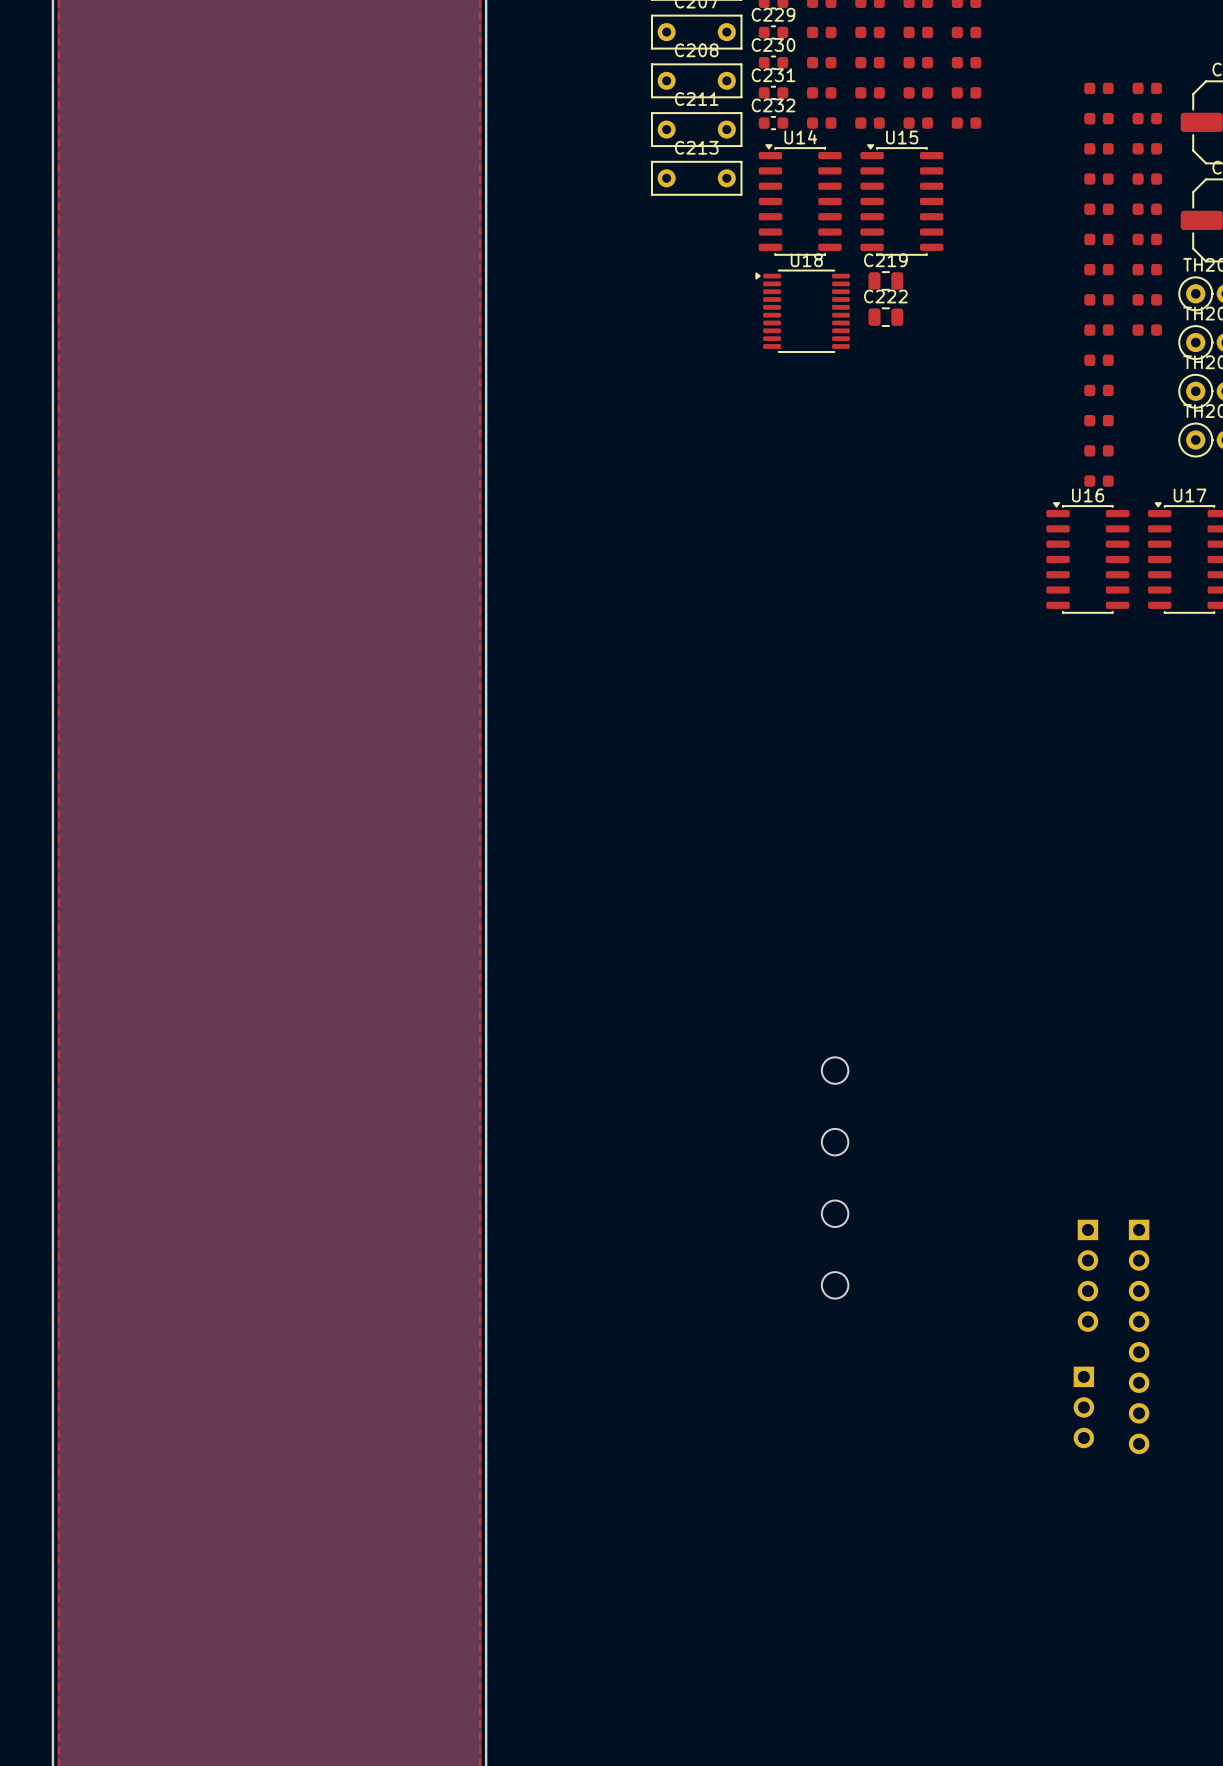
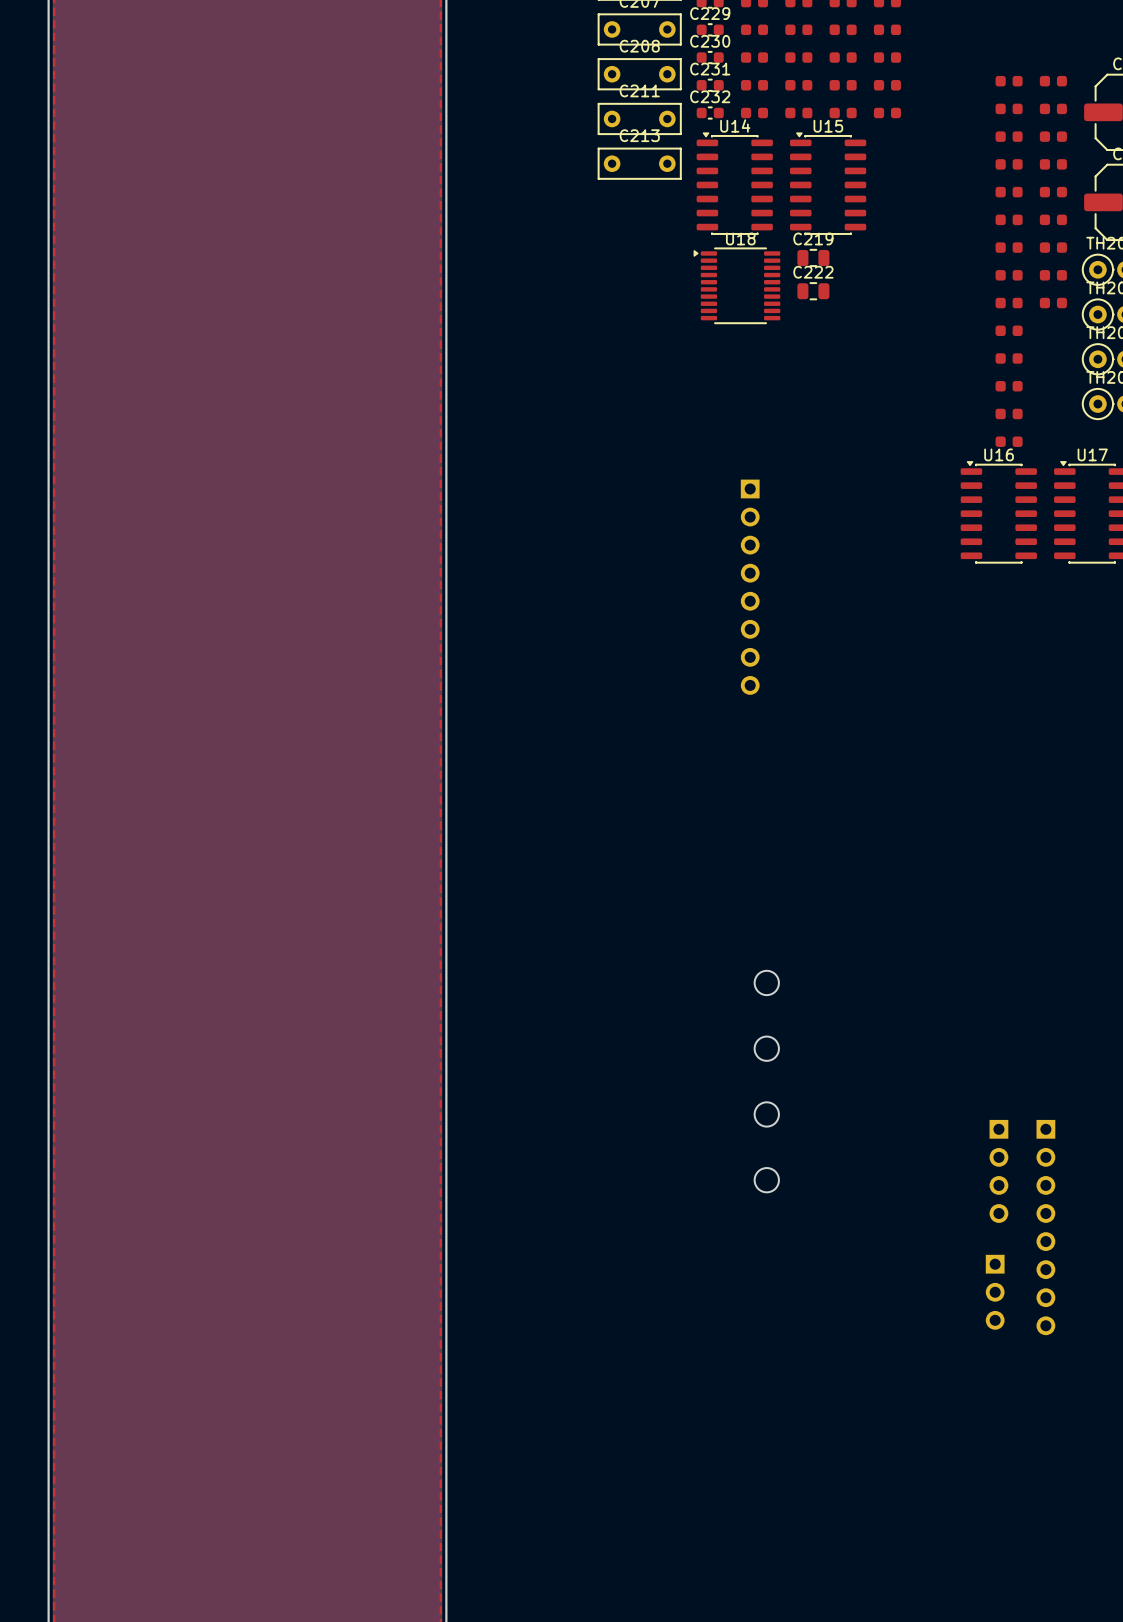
part: none -> (750, 587)

